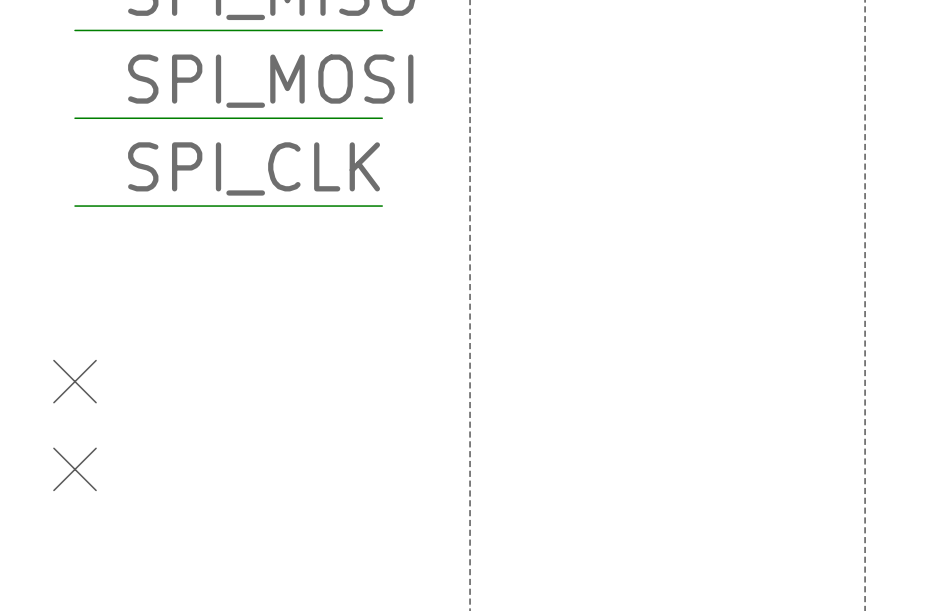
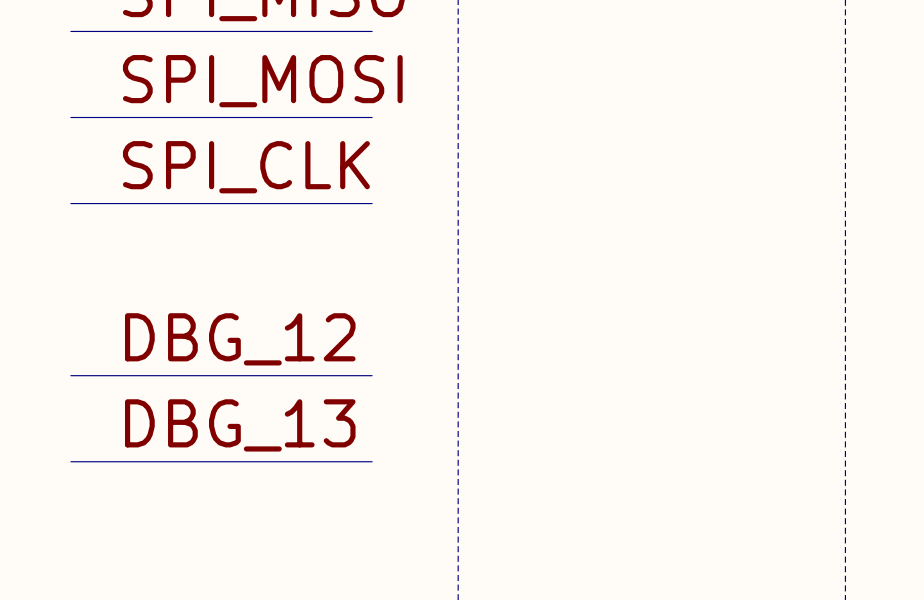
label: none -> DBG_12 (240, 339)
wire: none -> (70, 375) (372, 375)
no-connect mark: (75, 381) -> none
label: none -> DBG_13 (240, 425)
wire: none -> (70, 461) (372, 461)
no-connect mark: (75, 469) -> none

